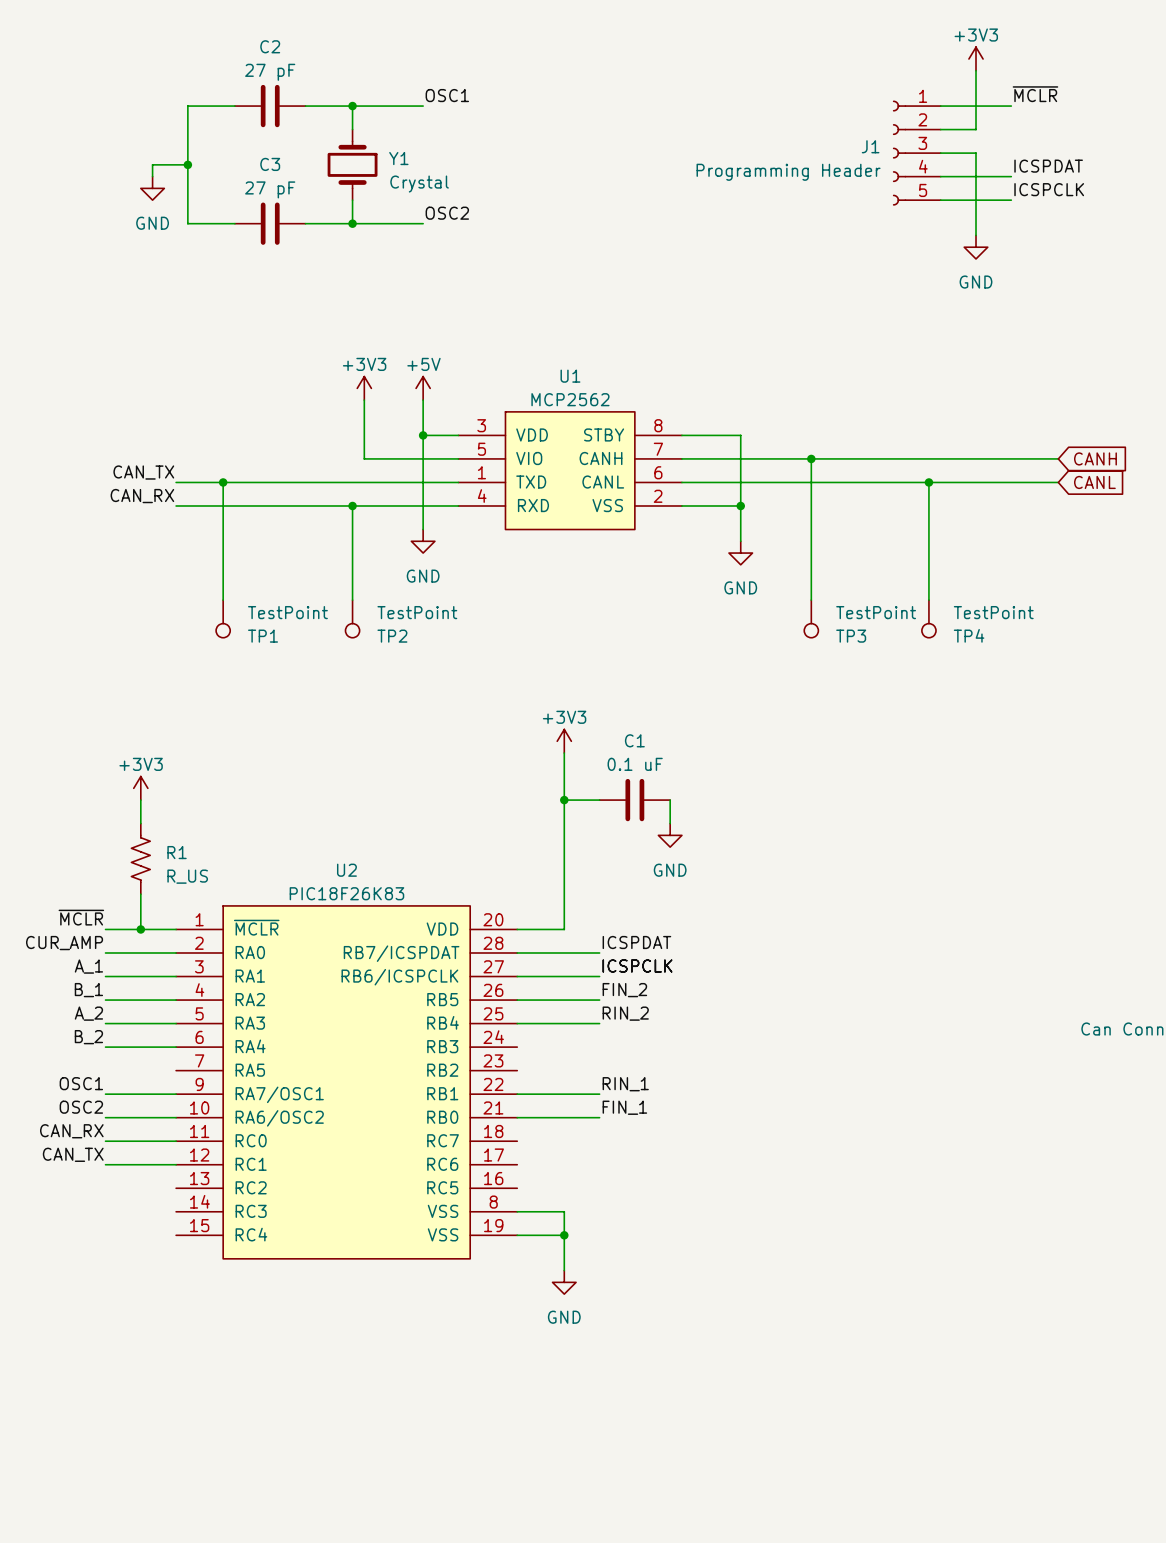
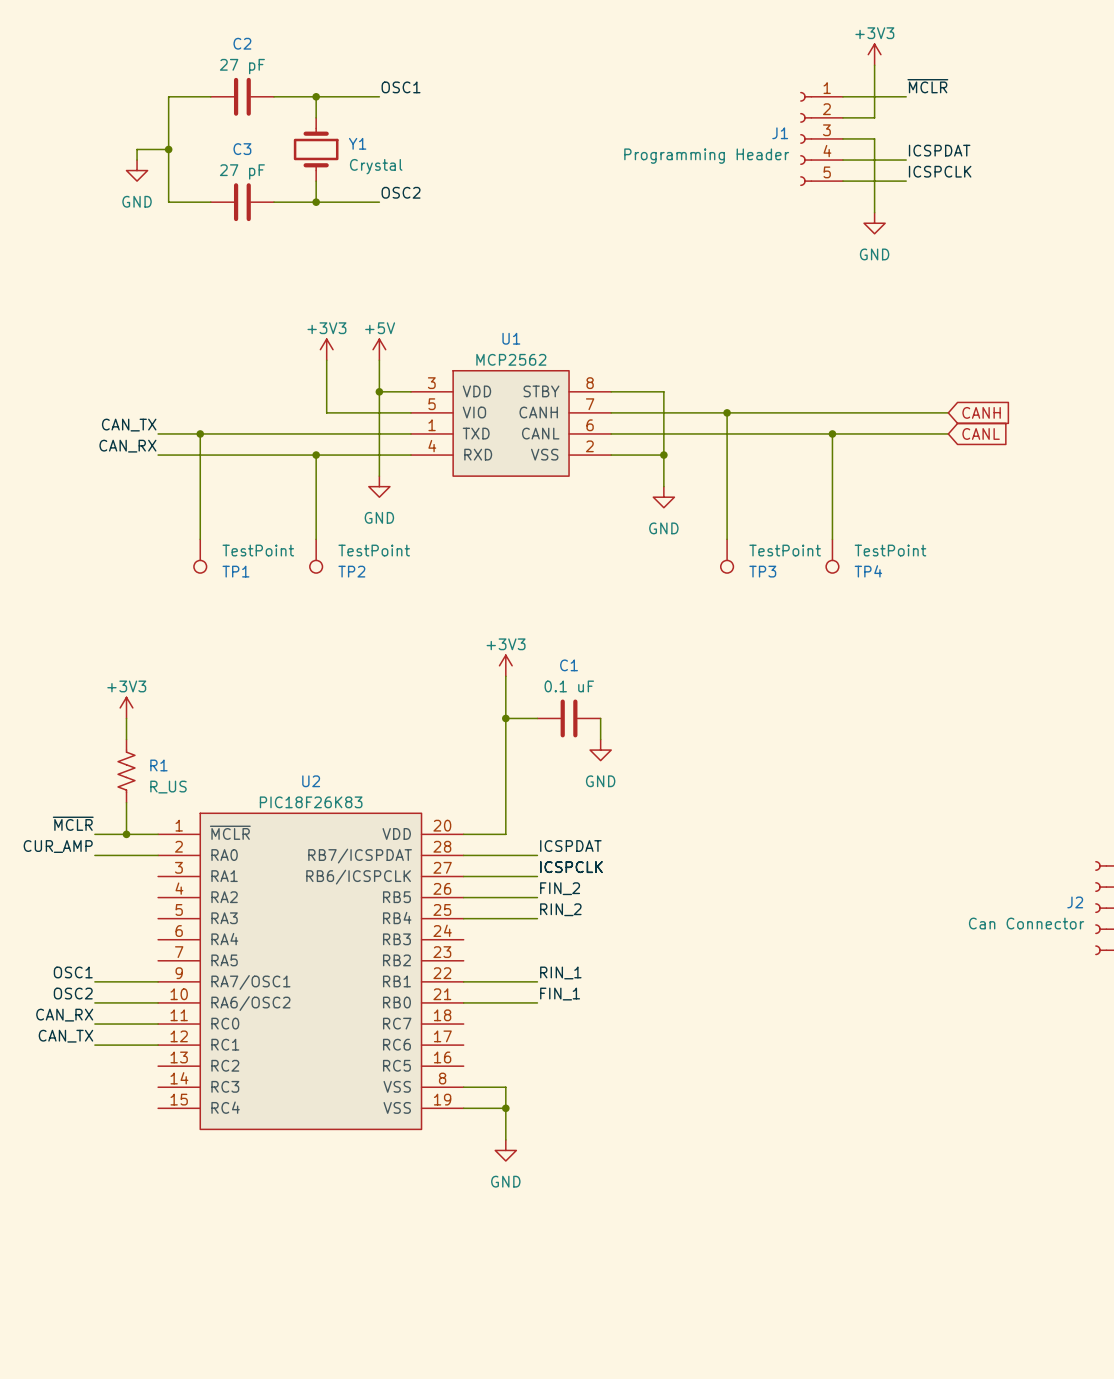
label: A_1 (88, 966) -> none
wire: (105, 976) (176, 976) -> none
label: B_1 (88, 990) -> none
wire: (105, 1000) (176, 1000) -> none
label: A_2 (88, 1013) -> none
wire: (105, 1023) (176, 1023) -> none
label: B_2 (88, 1037) -> none
wire: (105, 1047) (176, 1047) -> none

